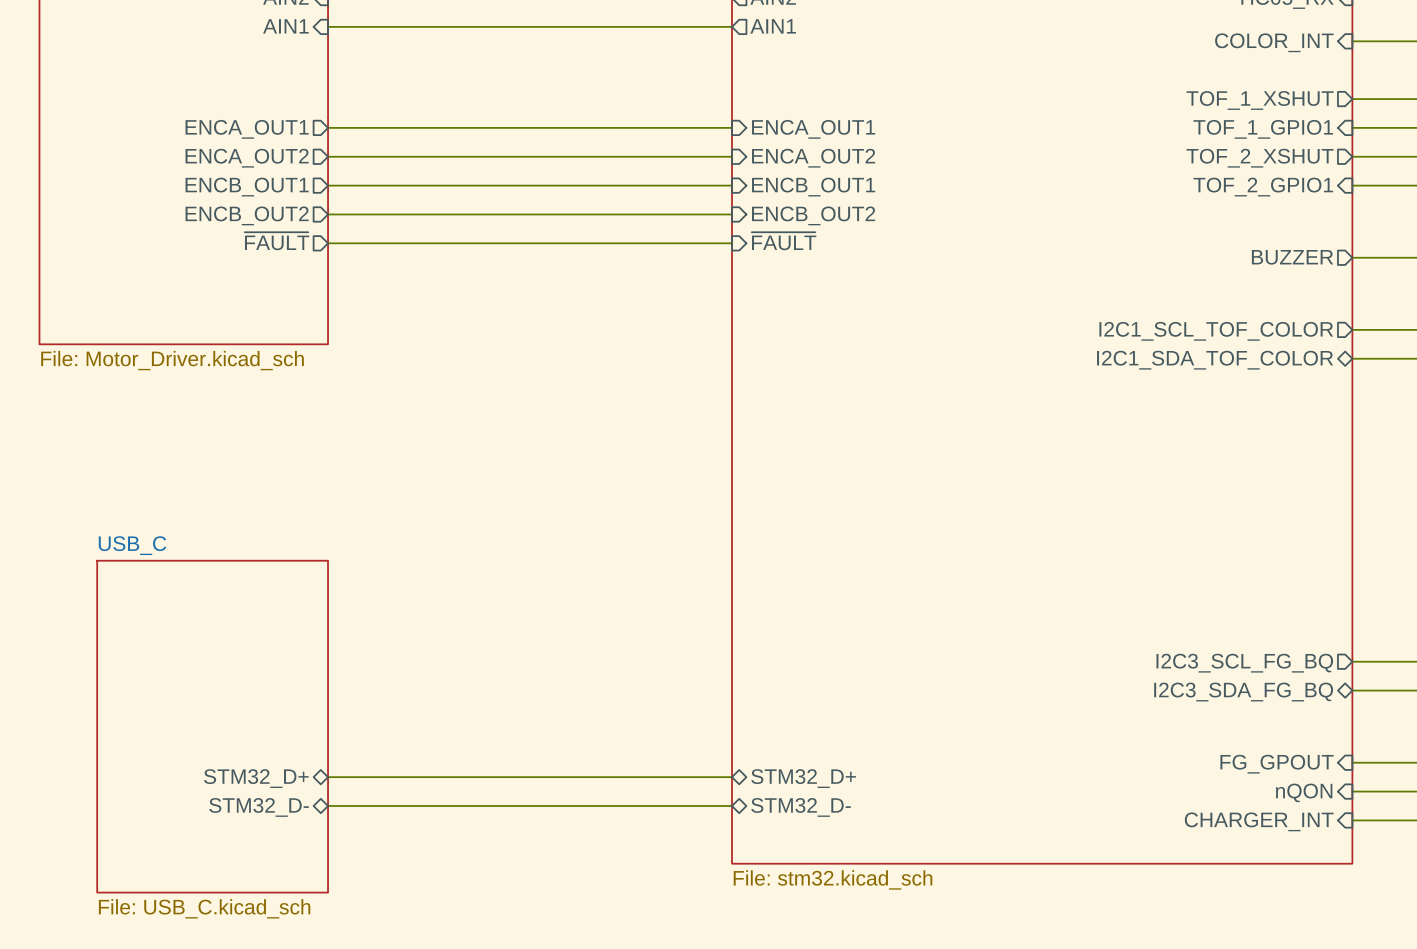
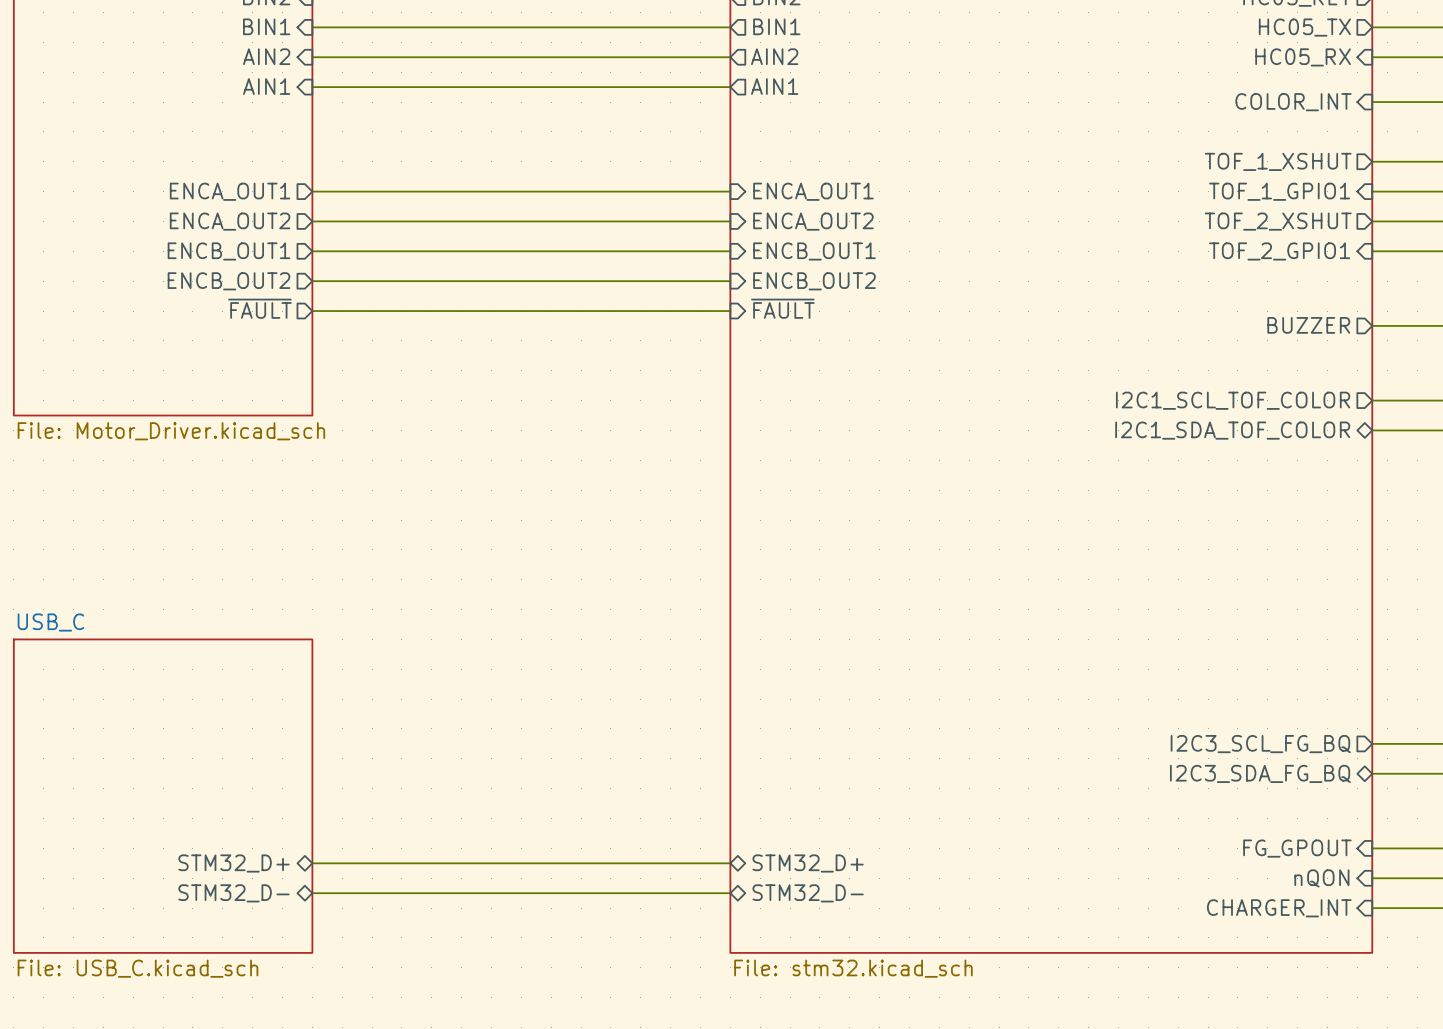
sheet USB_C: none -> File: USB_C.kicad_sch (163, 796)
sheet USB_C: File: USB_C.kicad_sch (212, 726) -> none

